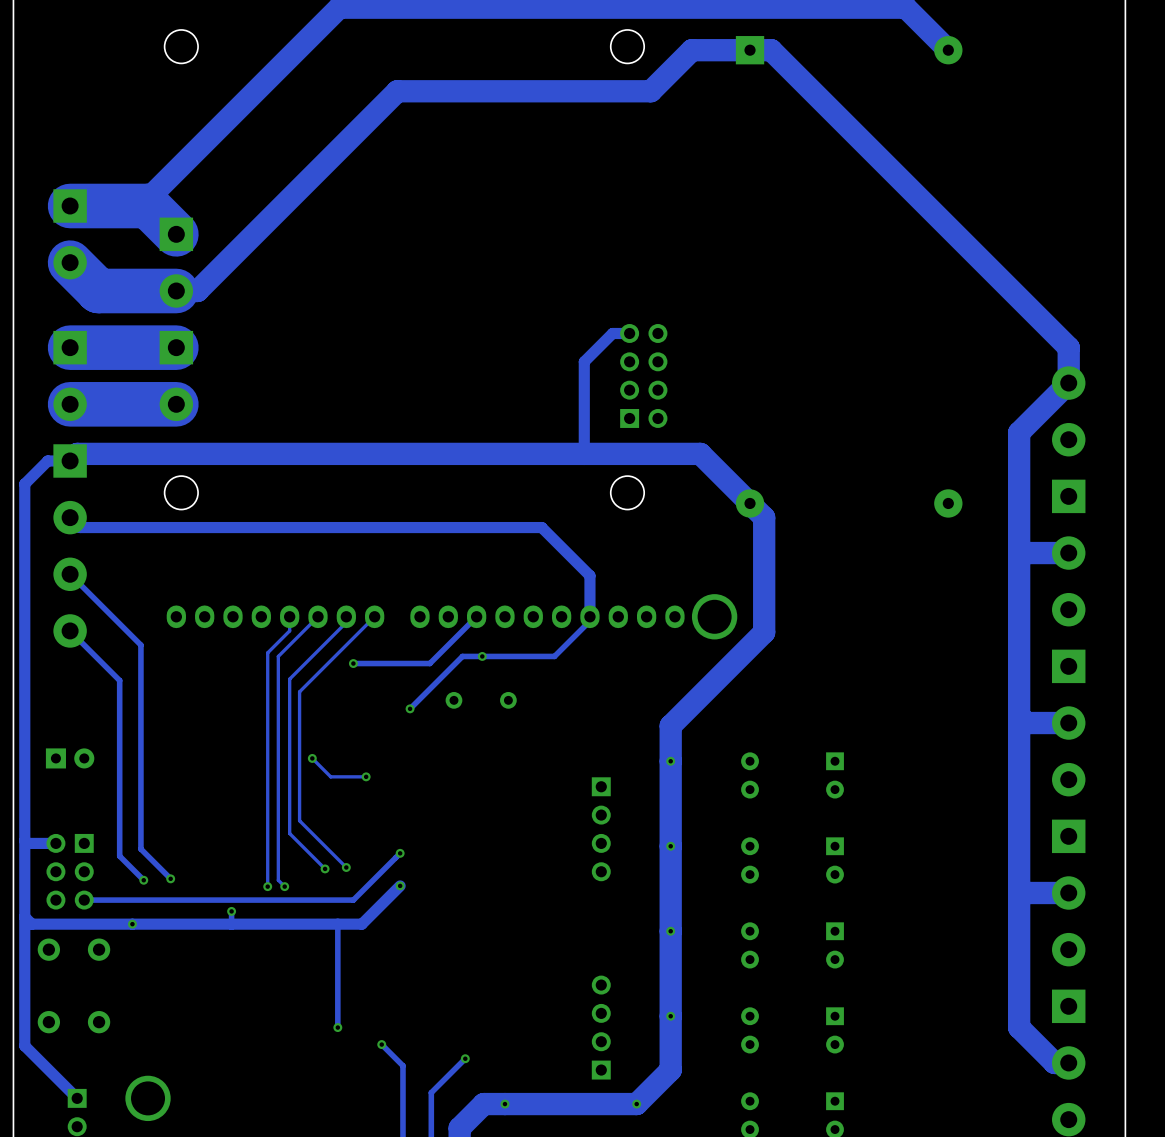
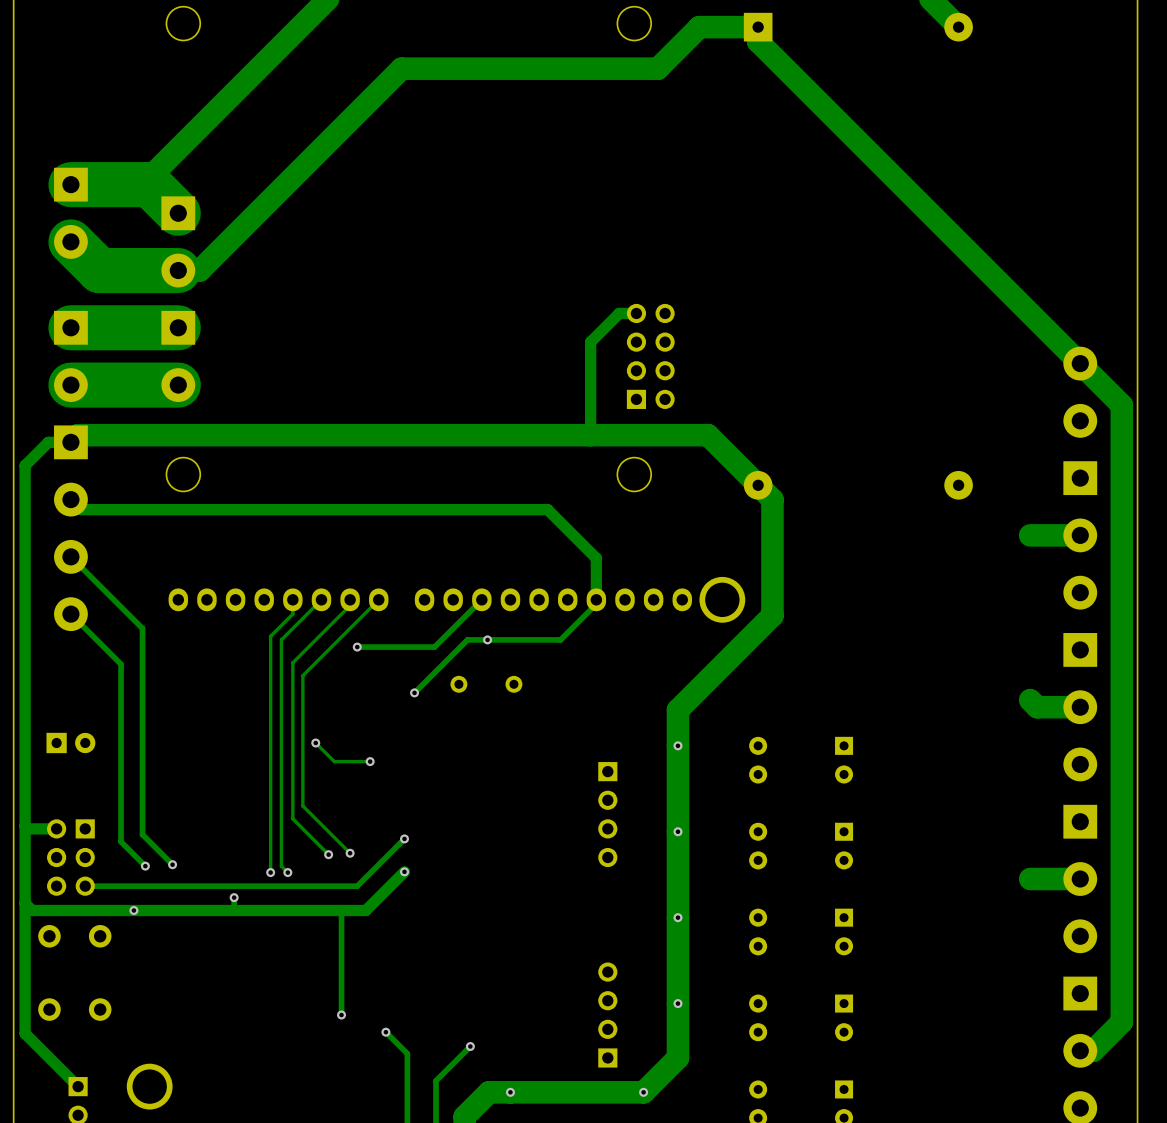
track: (750, 50) (771, 50) (1068, 347) (1068, 383) (1019, 432) (1019, 1027) (1054, 1062) (1068, 1062) -> (758, 27) (758, 41) (1121, 405) (1121, 1022) (1093, 1050) (1080, 1050)

